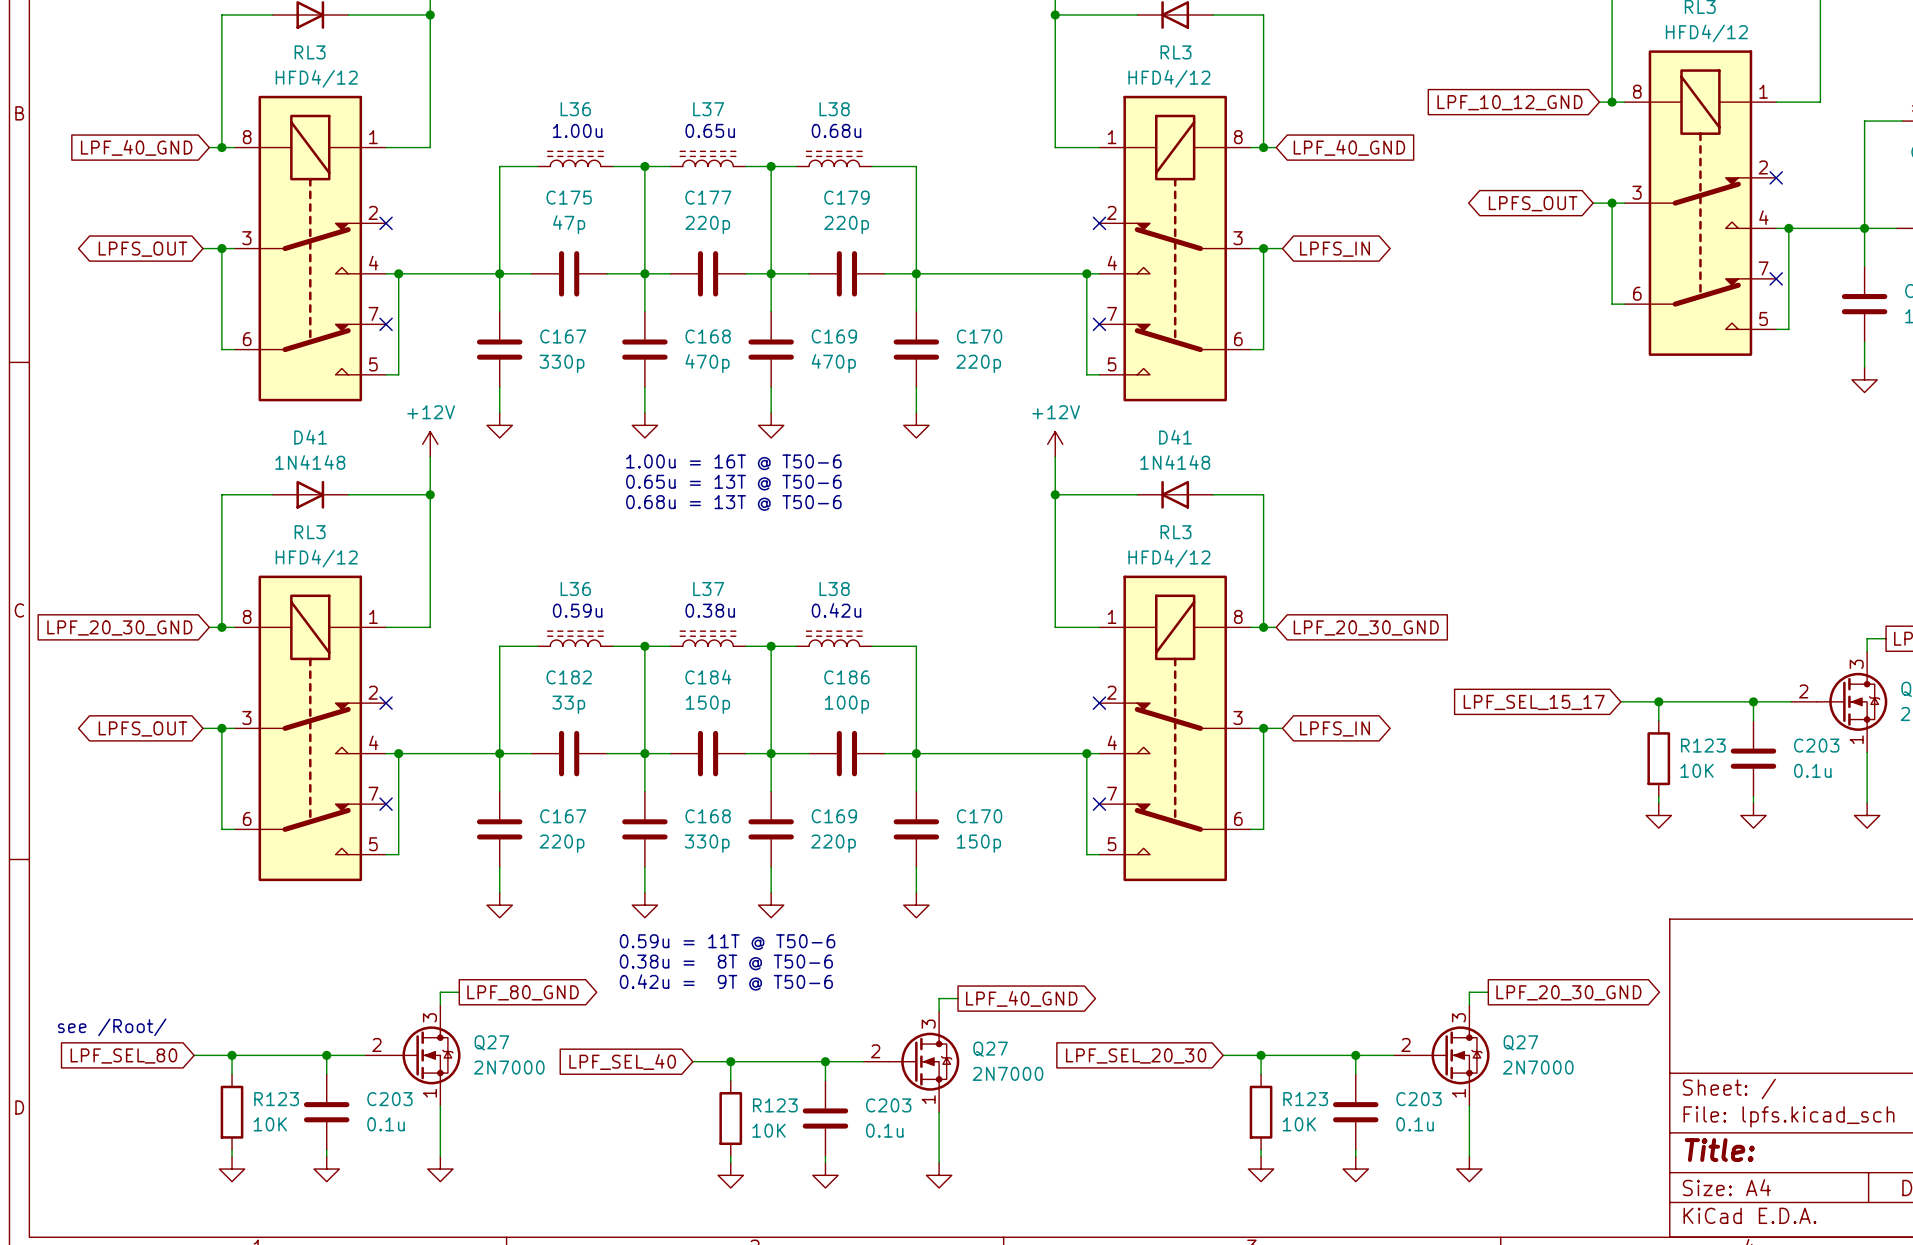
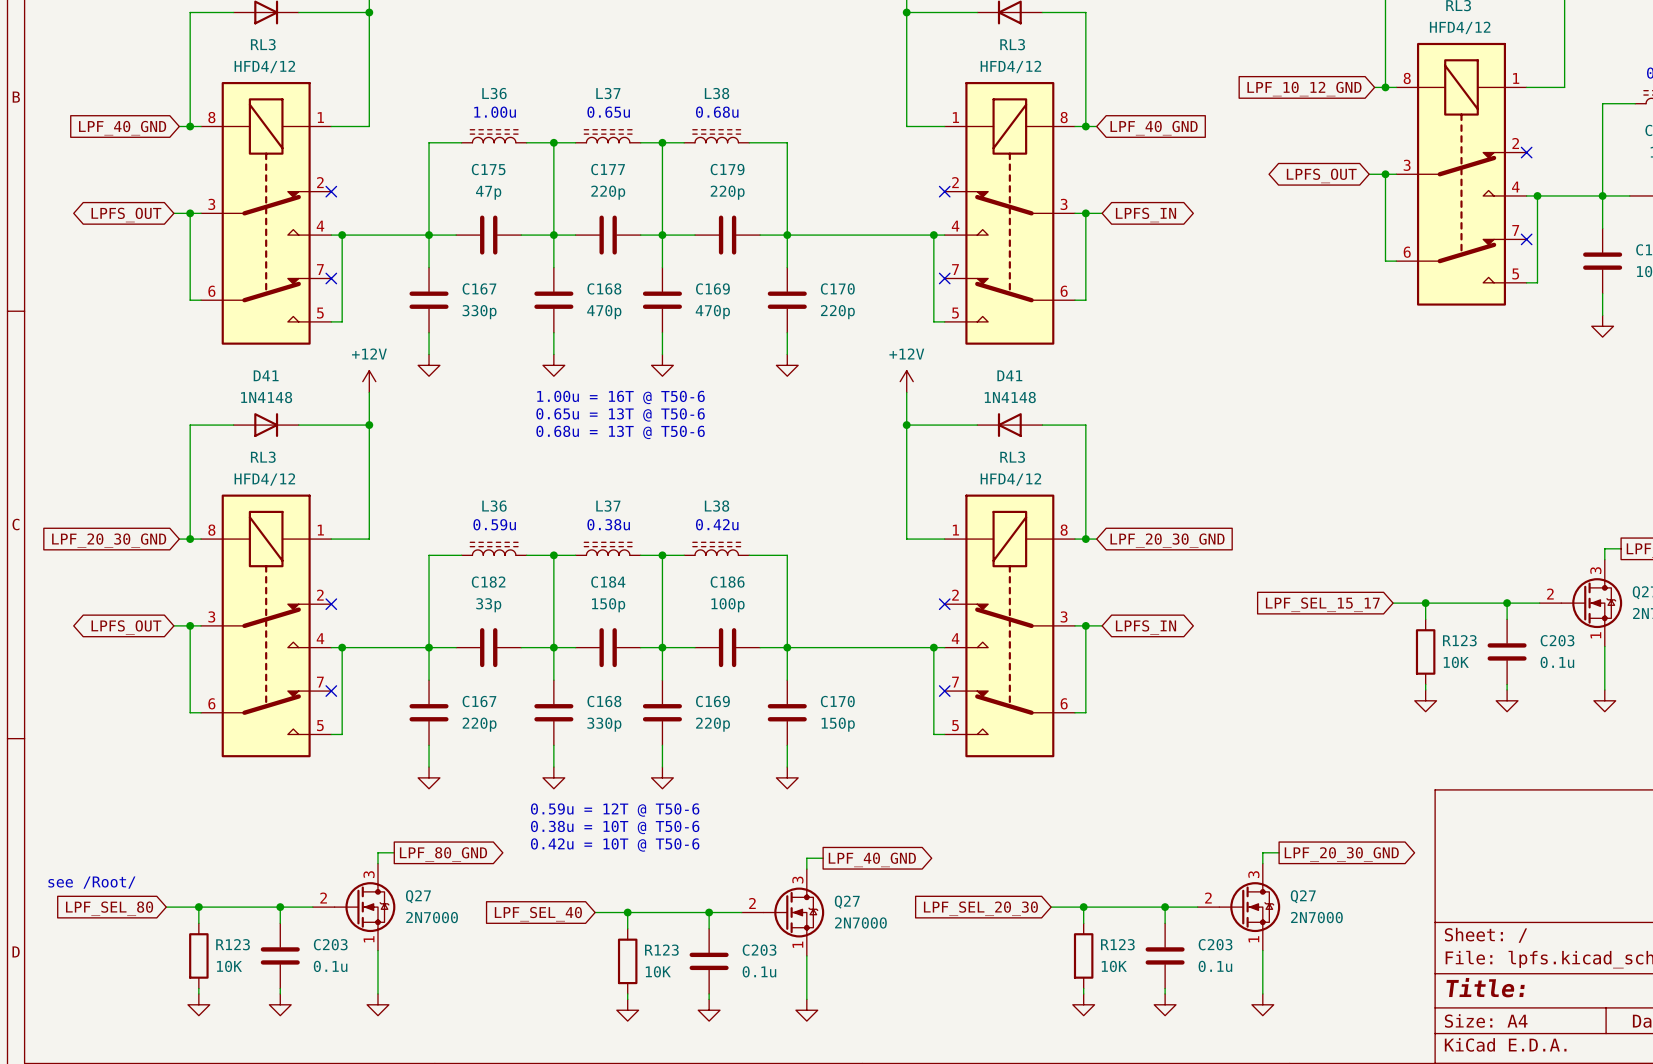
text: 0.59u = 11T @ T50-6 (727, 942) -> 0.59u = 12T @ T50-6 (615, 810)
text: 0.38u = 8T @ T50-6 (726, 962) -> 0.38u = 10T @ T50-6 (615, 827)
text: 0.42u = 9T @ T50-6 (726, 982) -> 0.42u = 10T @ T50-6 (615, 844)

